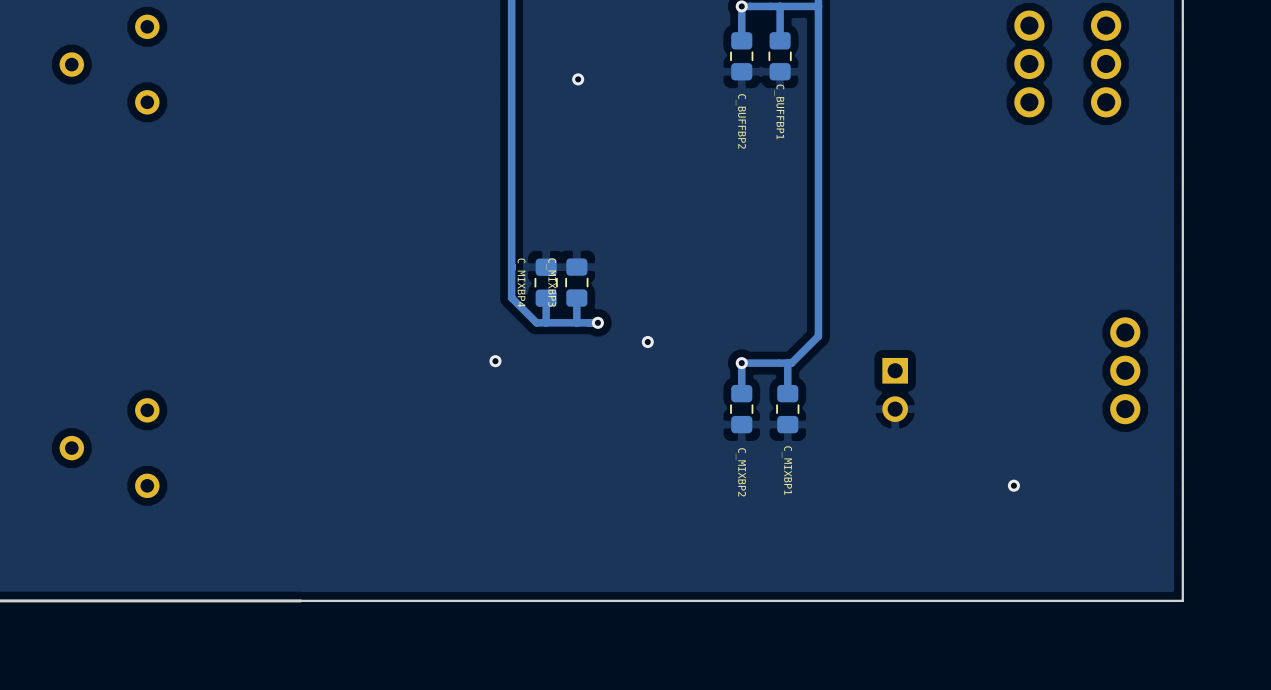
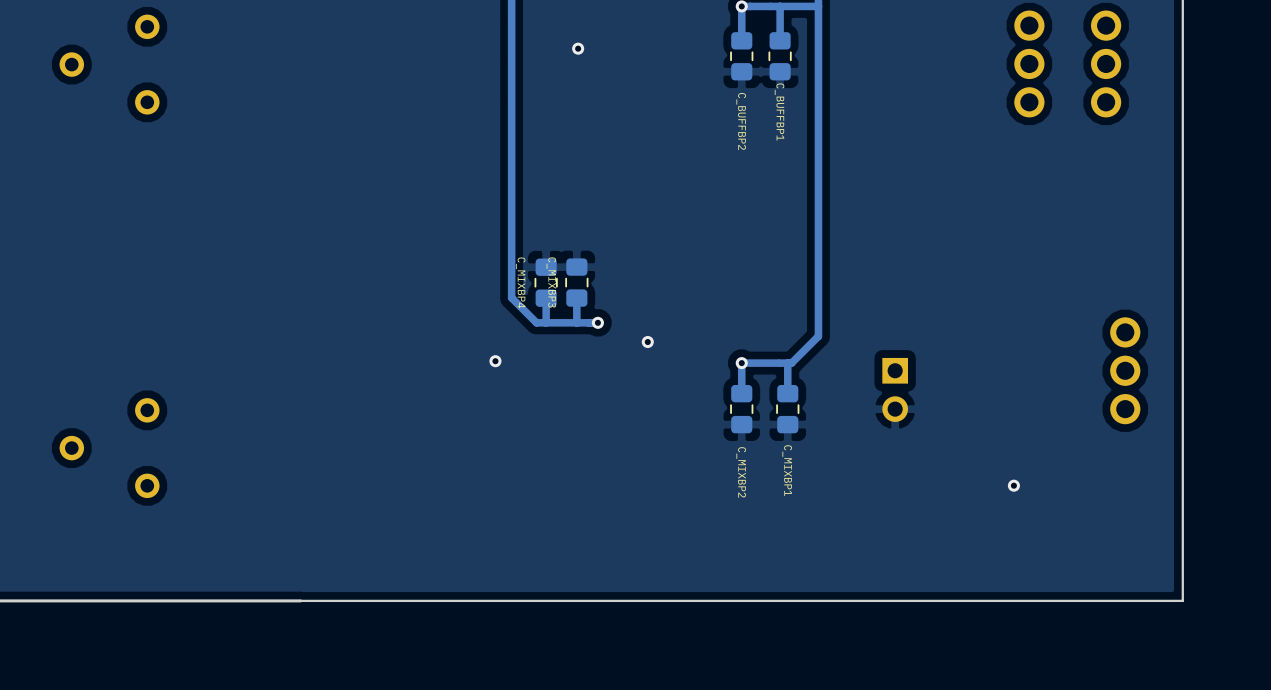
via position: (578, 79) -> (578, 48)

